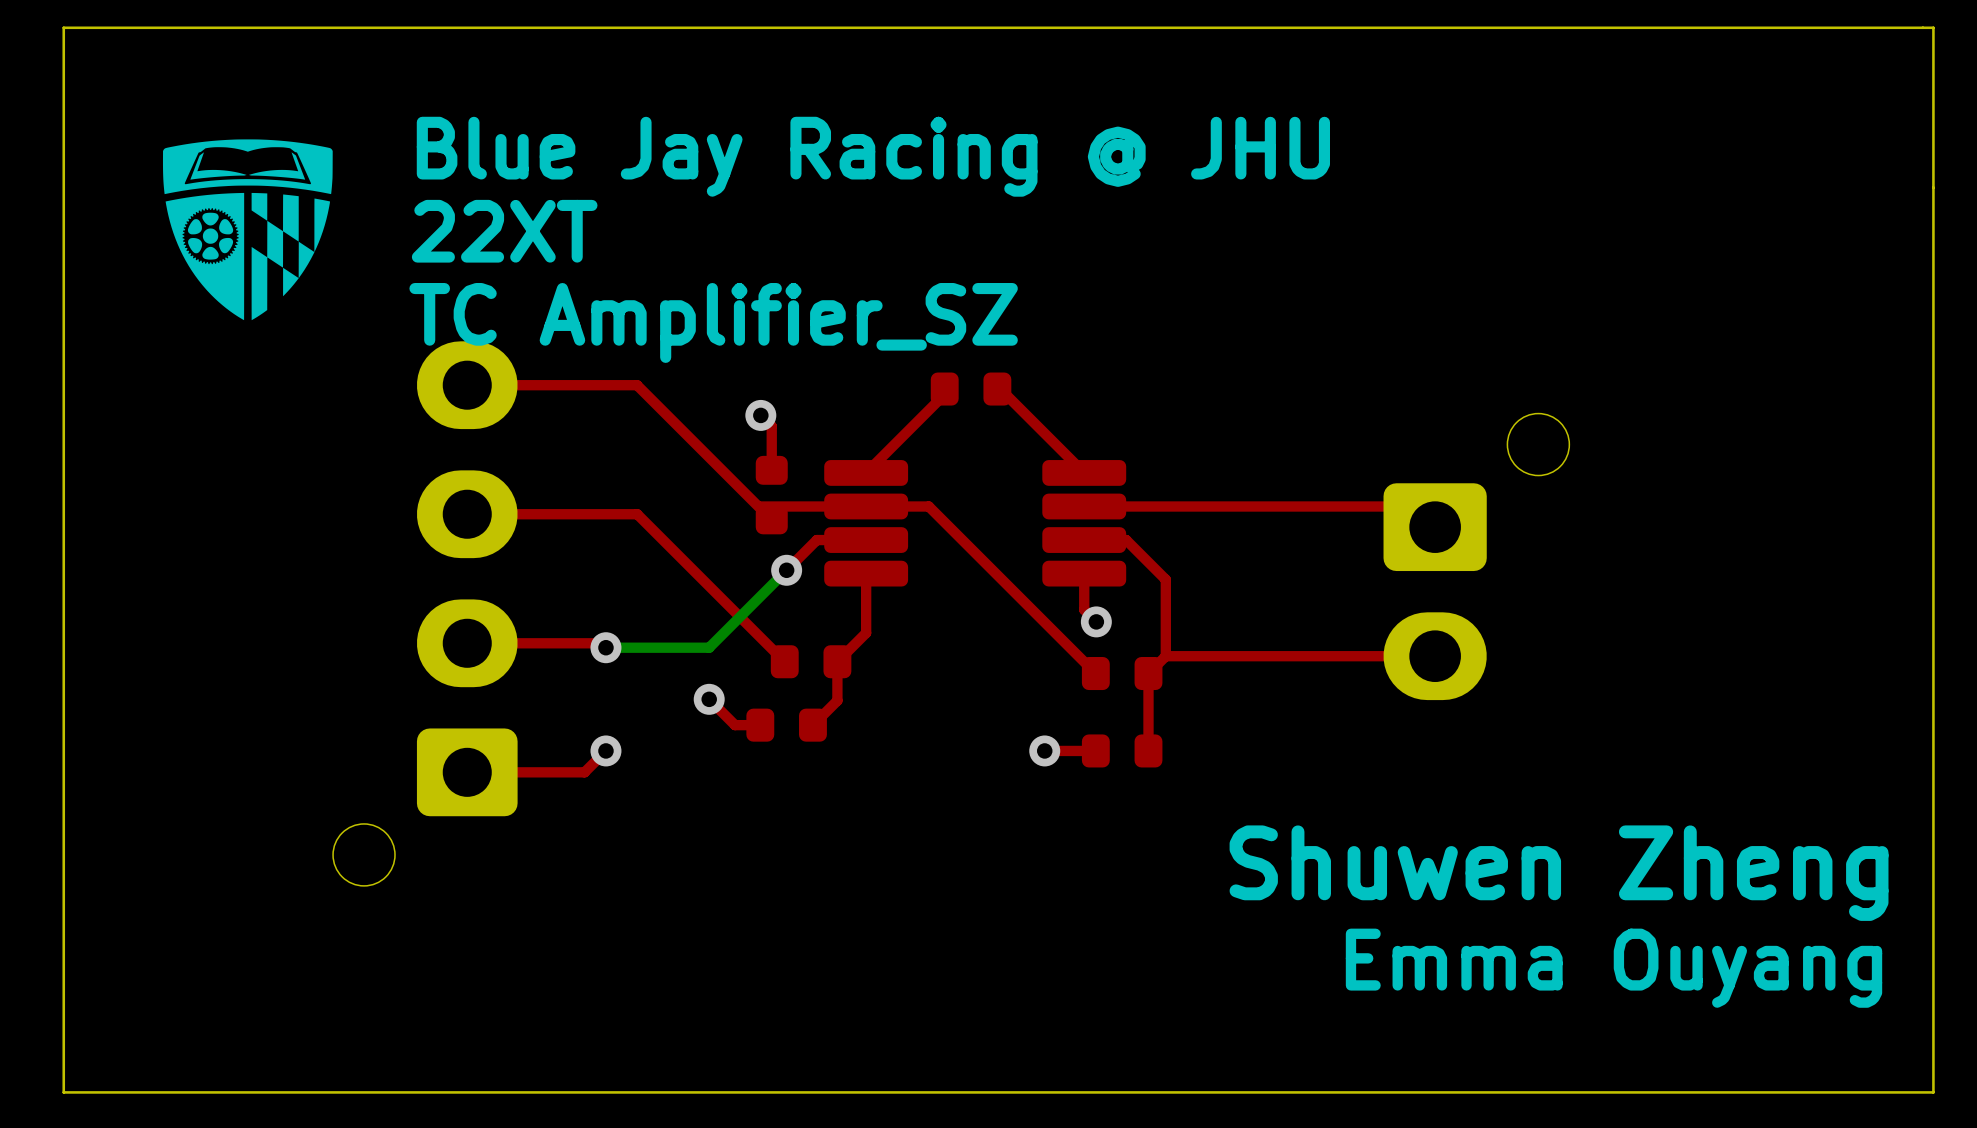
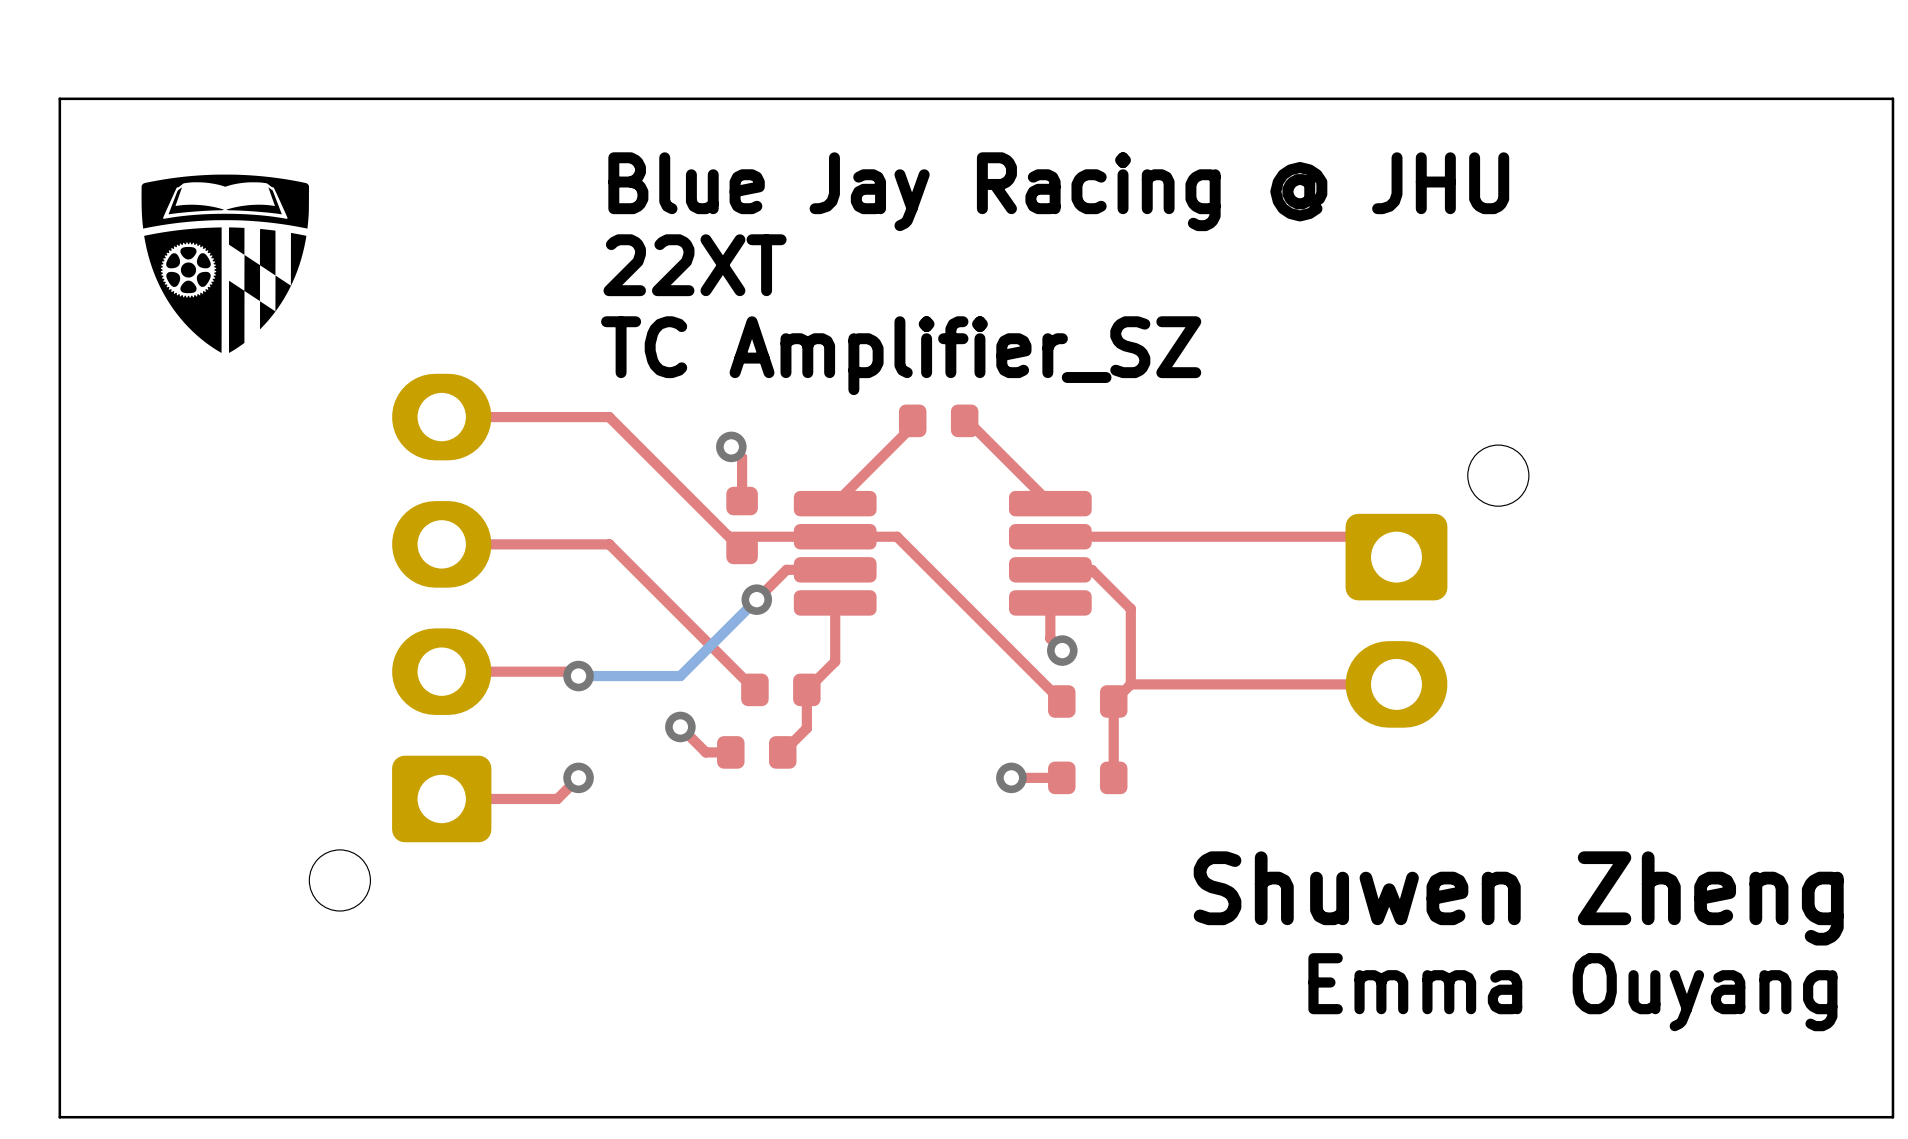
board edge: (1933, 27) (1933, 1092) (63, 1092) (63, 27) (1933, 27) -> (1892, 98) (1892, 1117) (59, 1117) (59, 98) (1892, 98)
text position: Blue Jay Racing @ JHU (873, 156) -> Blue Jay Racing @ JHU (1058, 191)
text position: 22XT (504, 231) -> 22XT (695, 265)
text position: TC Amplifier_SZ (713, 322) -> TC Amplifier_SZ (901, 355)

